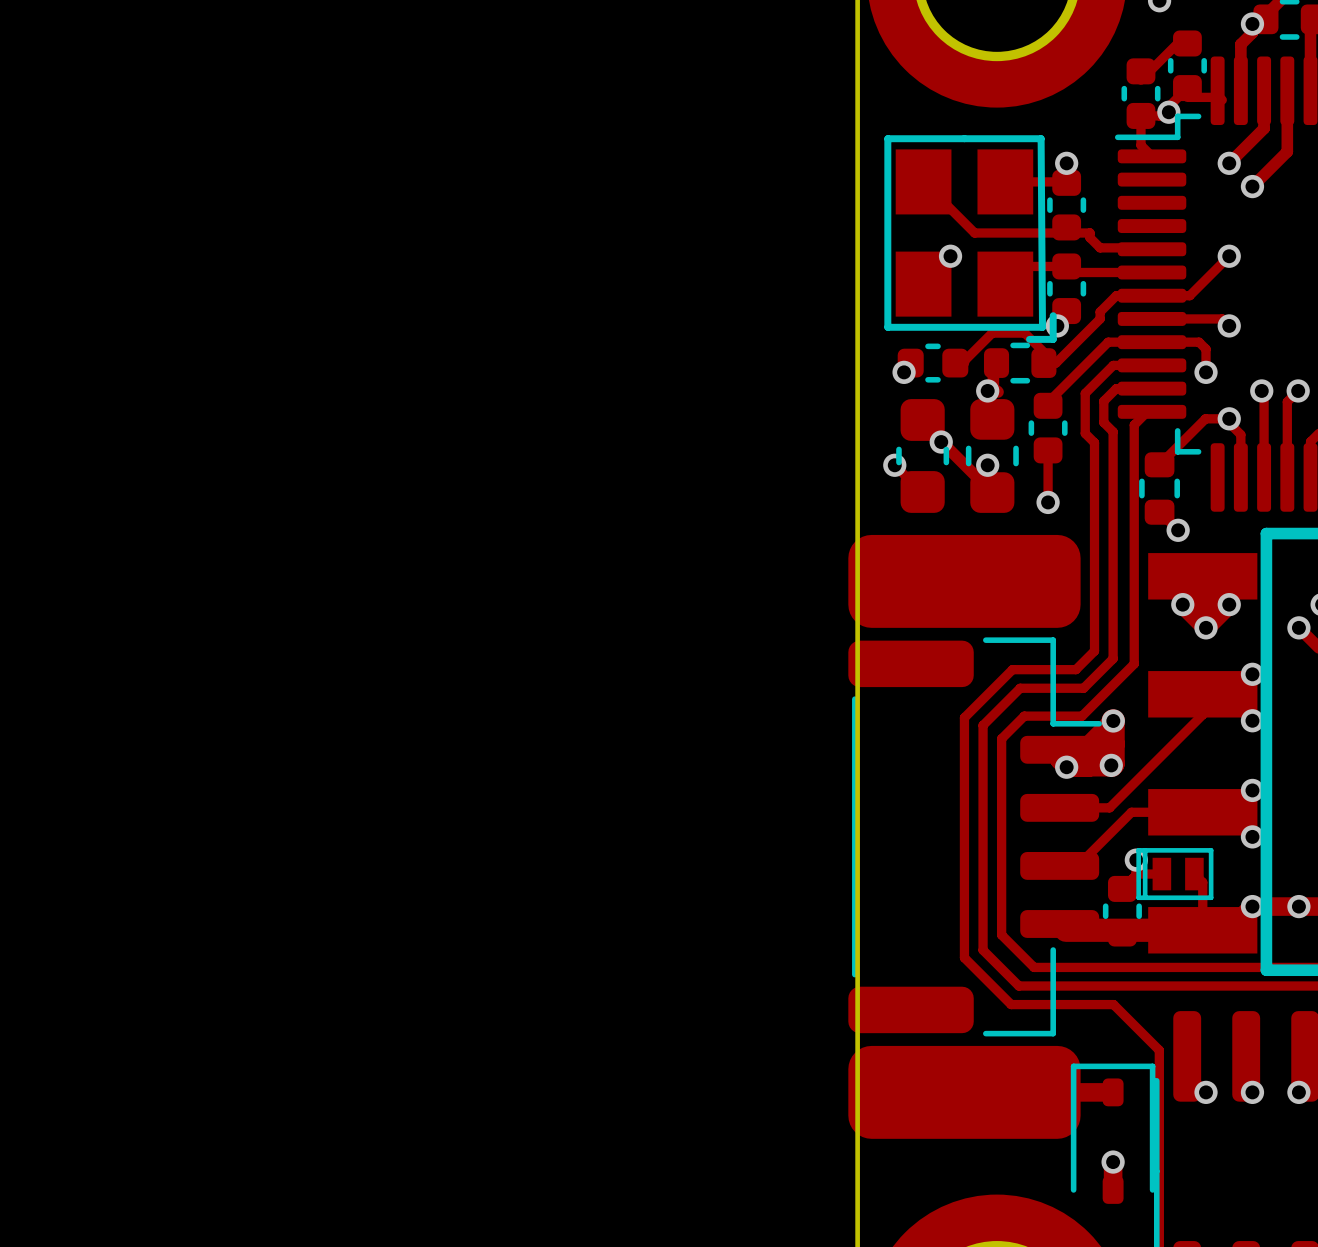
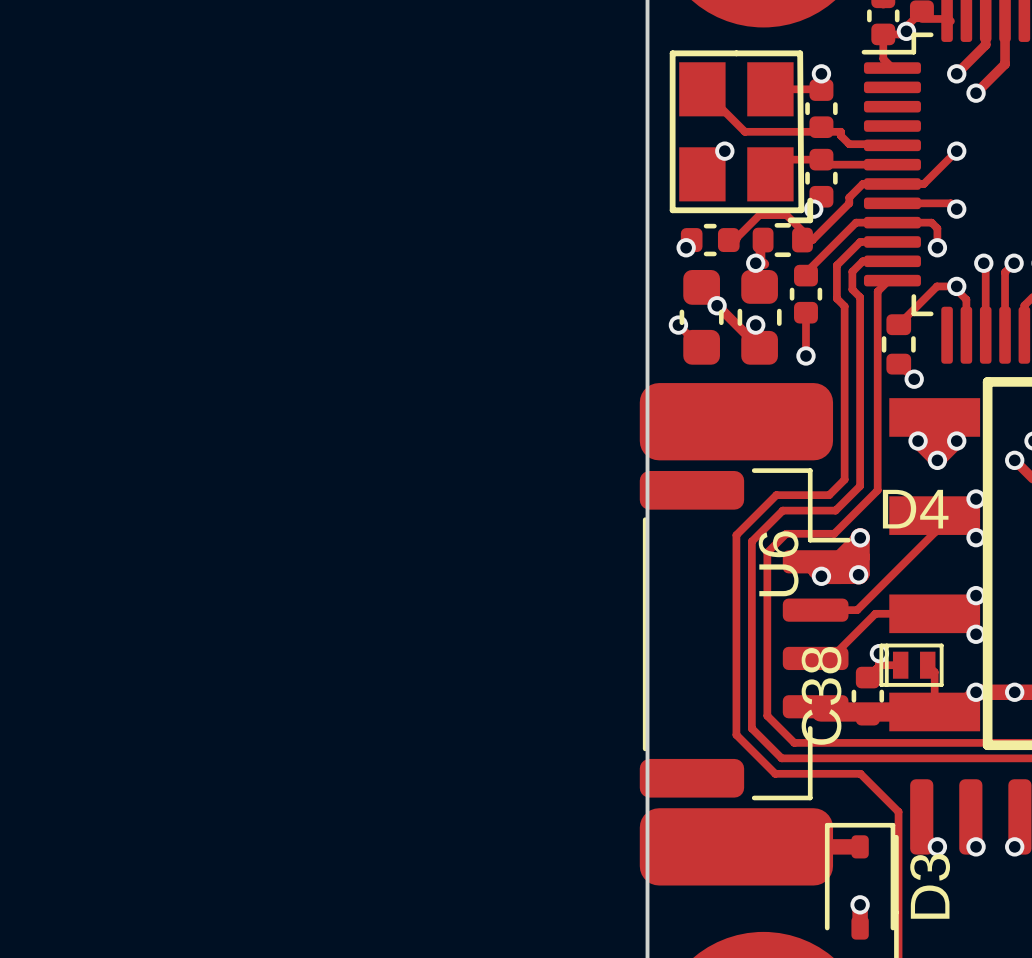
D4 name: none -> D4 (915, 509)
U6 name: none -> U6 (778, 563)
C38 name: none -> C38 (821, 695)
D3 name: none -> D3 (930, 886)

